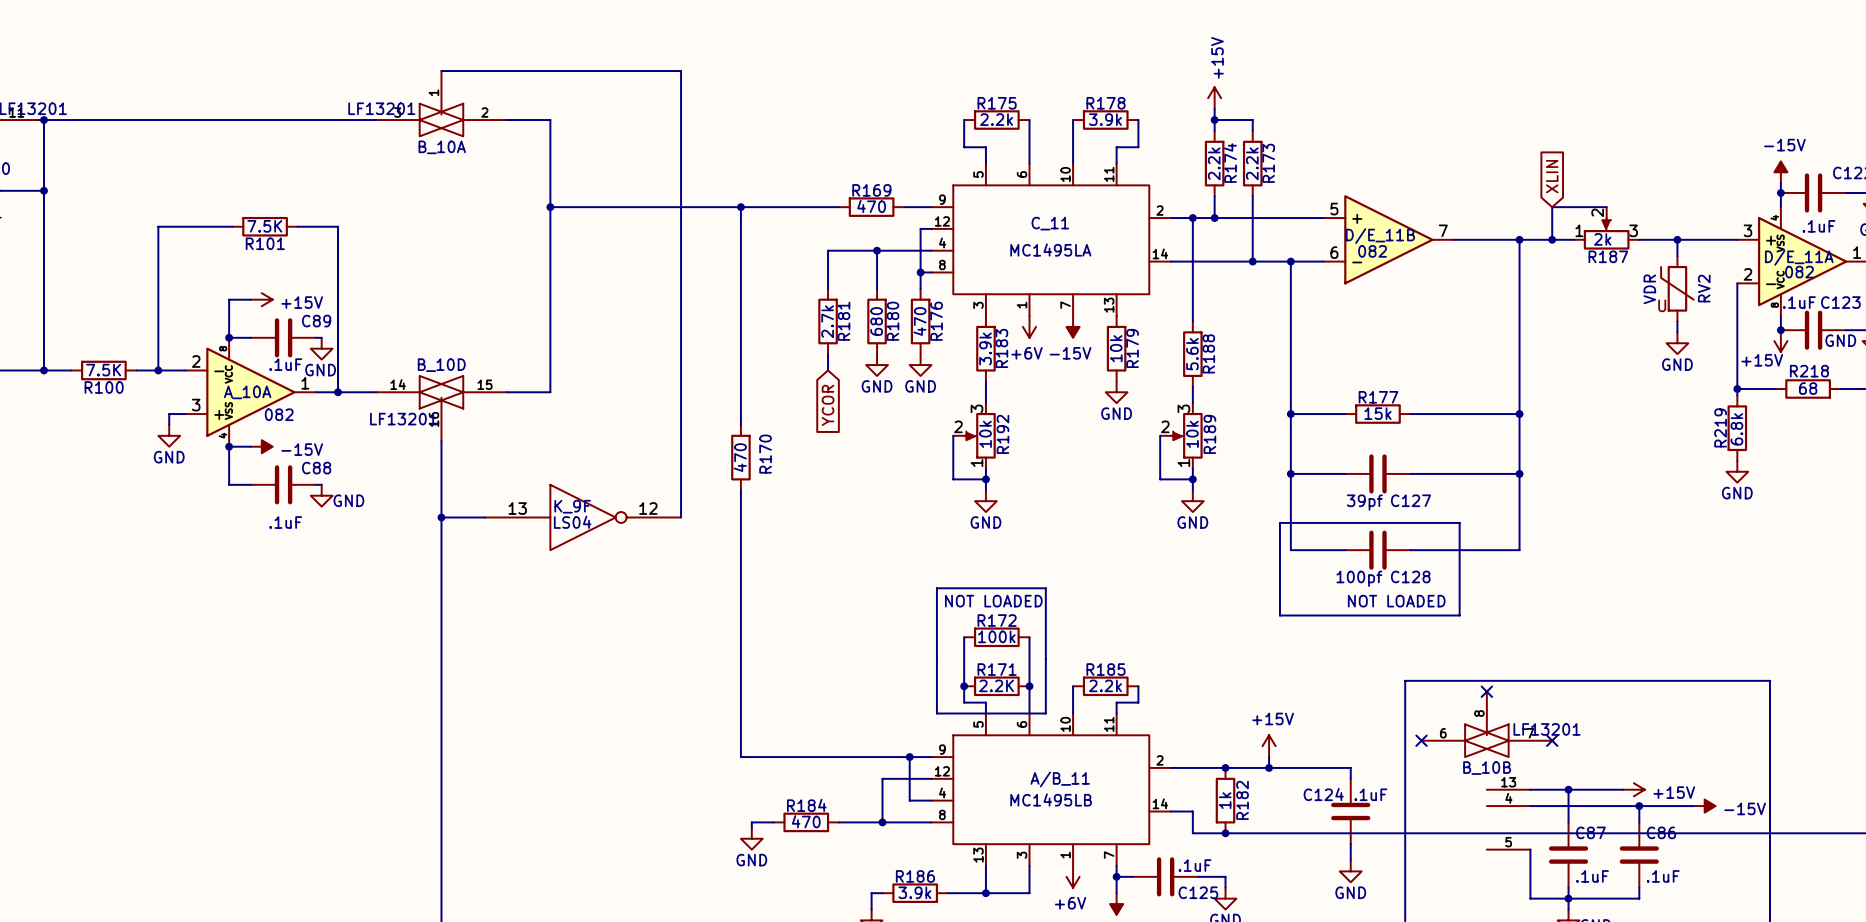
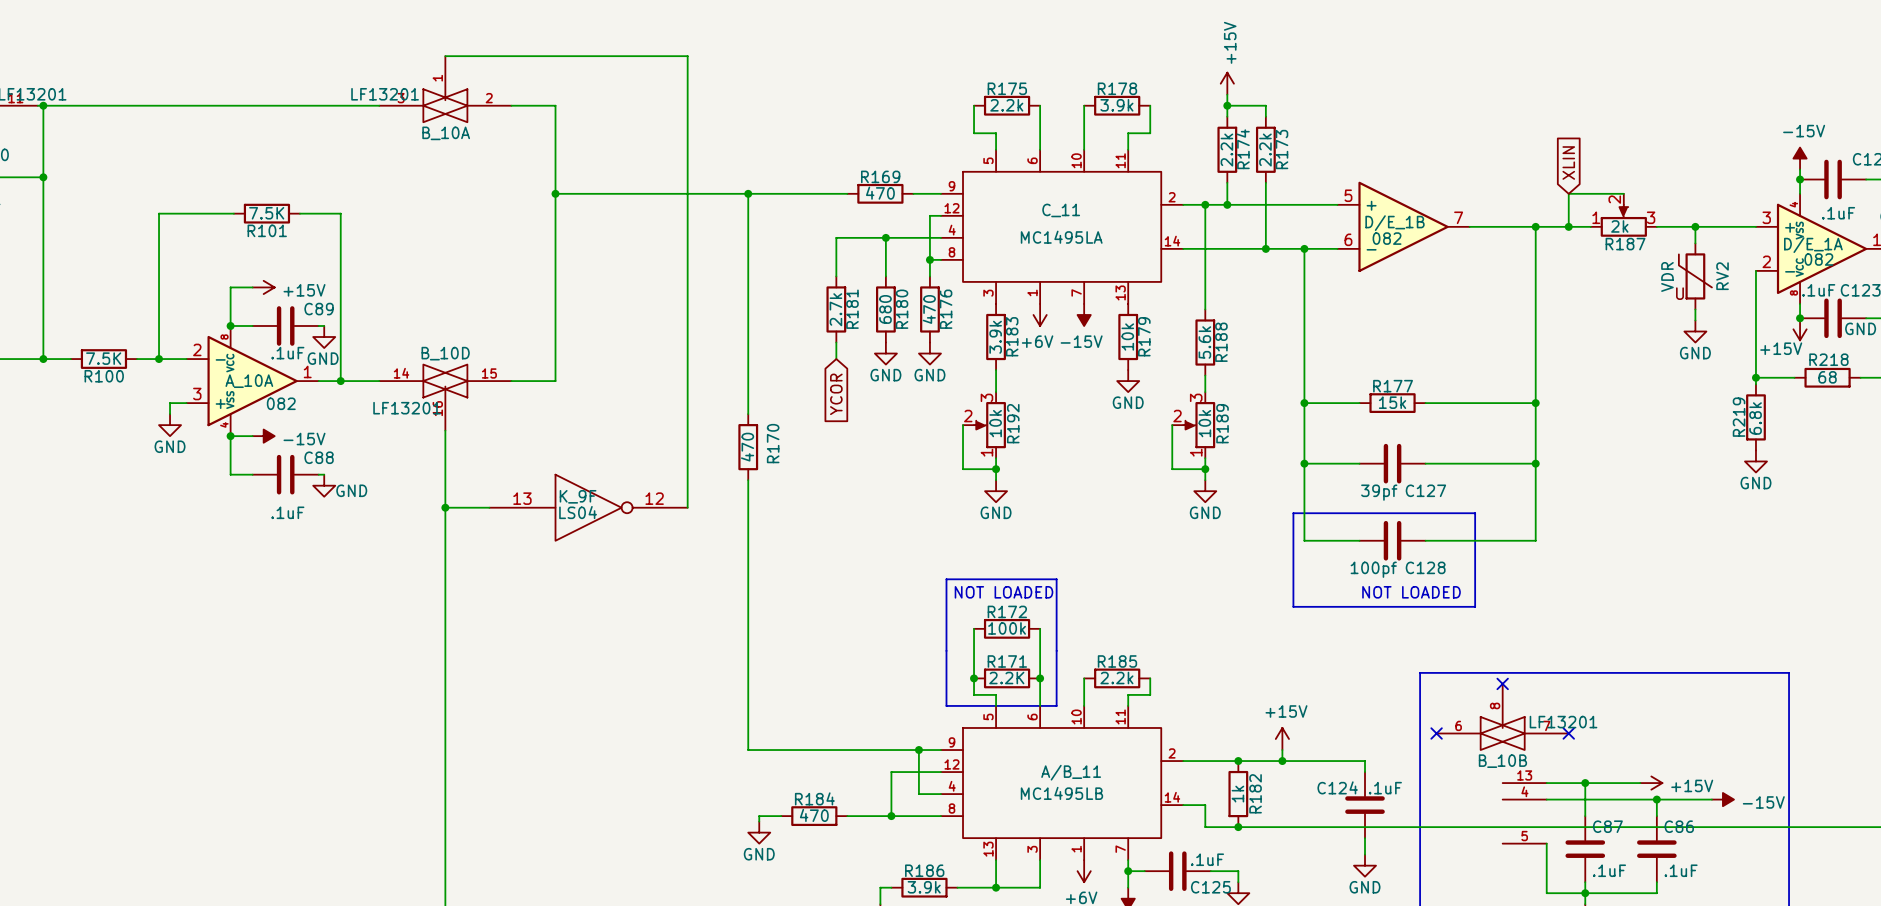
D/E_11B name: D/E_11B (1380, 236) -> D/E_1B (1395, 223)
D/E_11A name: D/E_11A (1799, 257) -> D/E_1A (1813, 245)

